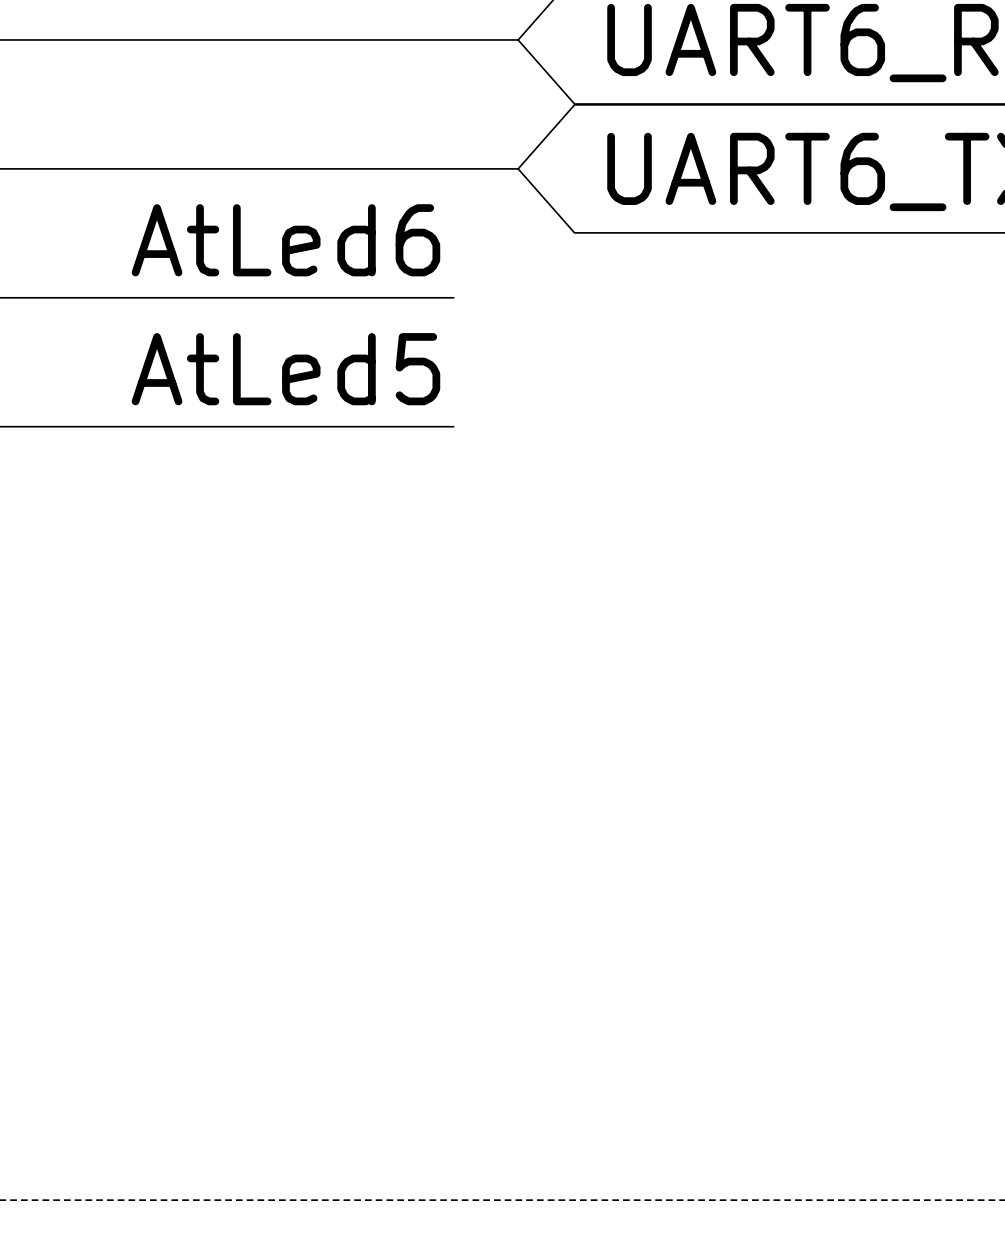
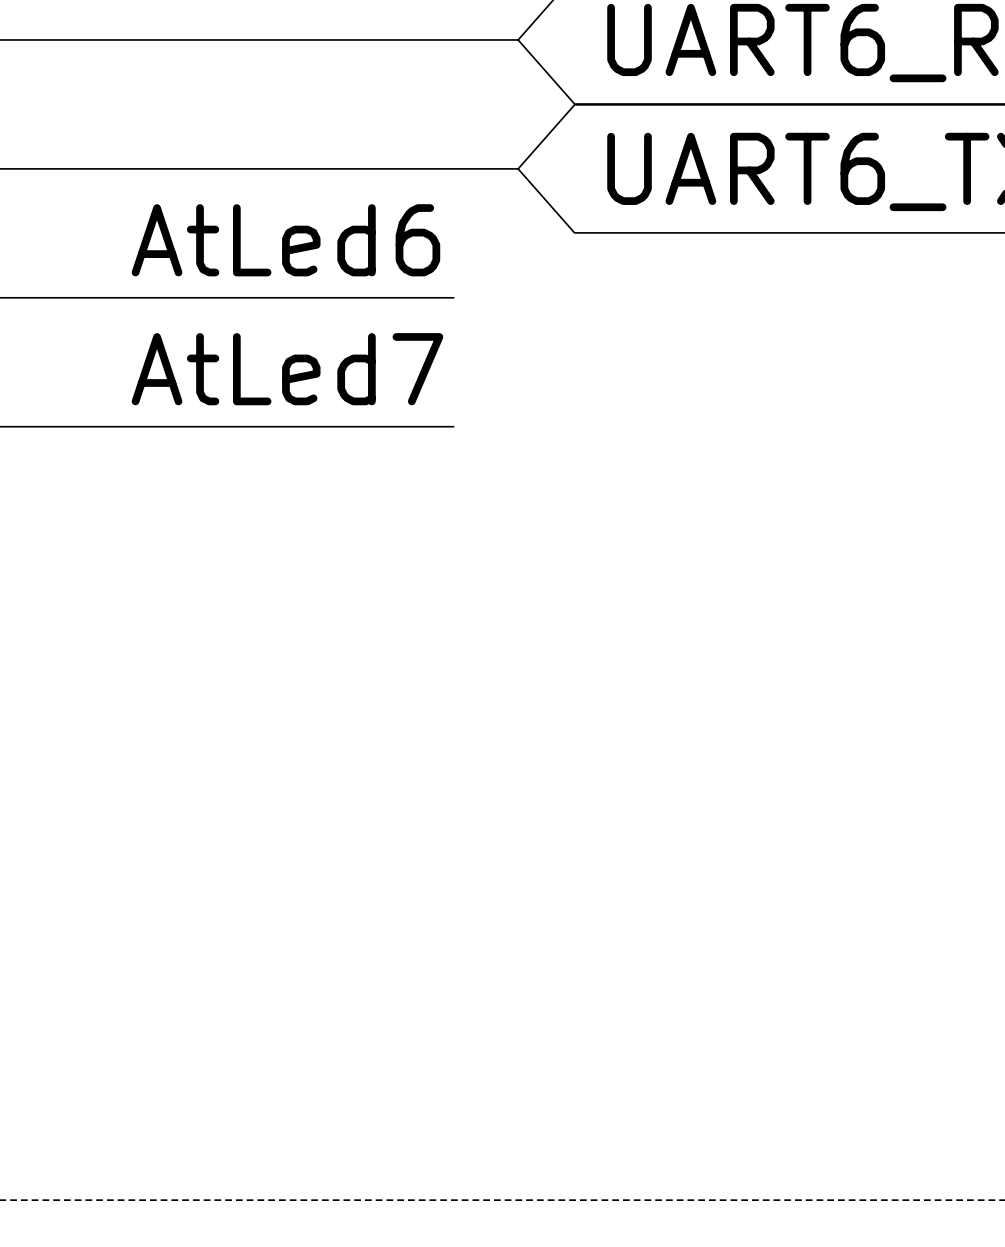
label: AtLed5 (285, 369) -> AtLed7 (287, 369)

